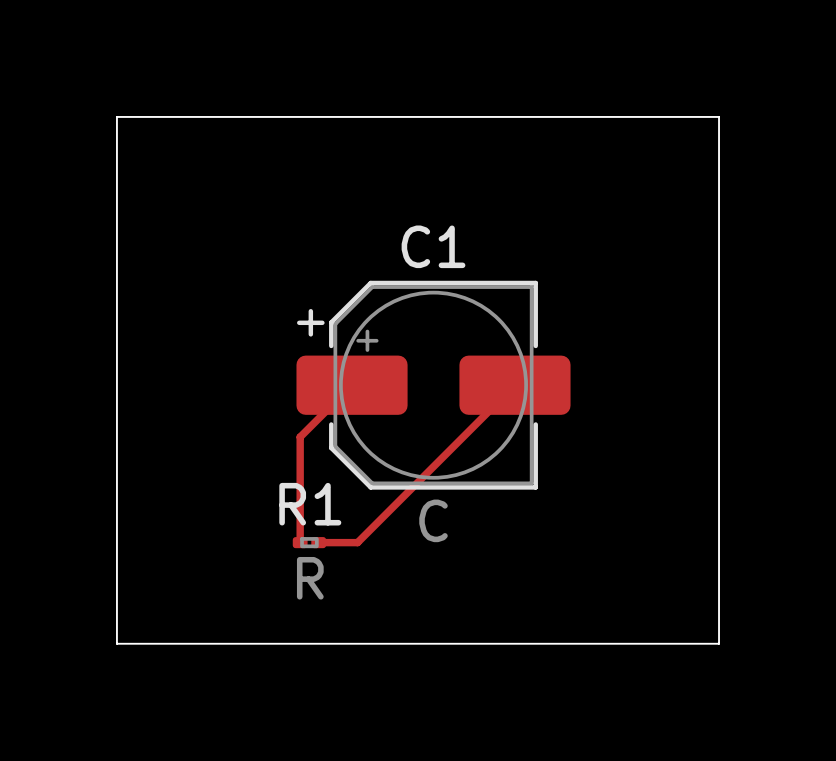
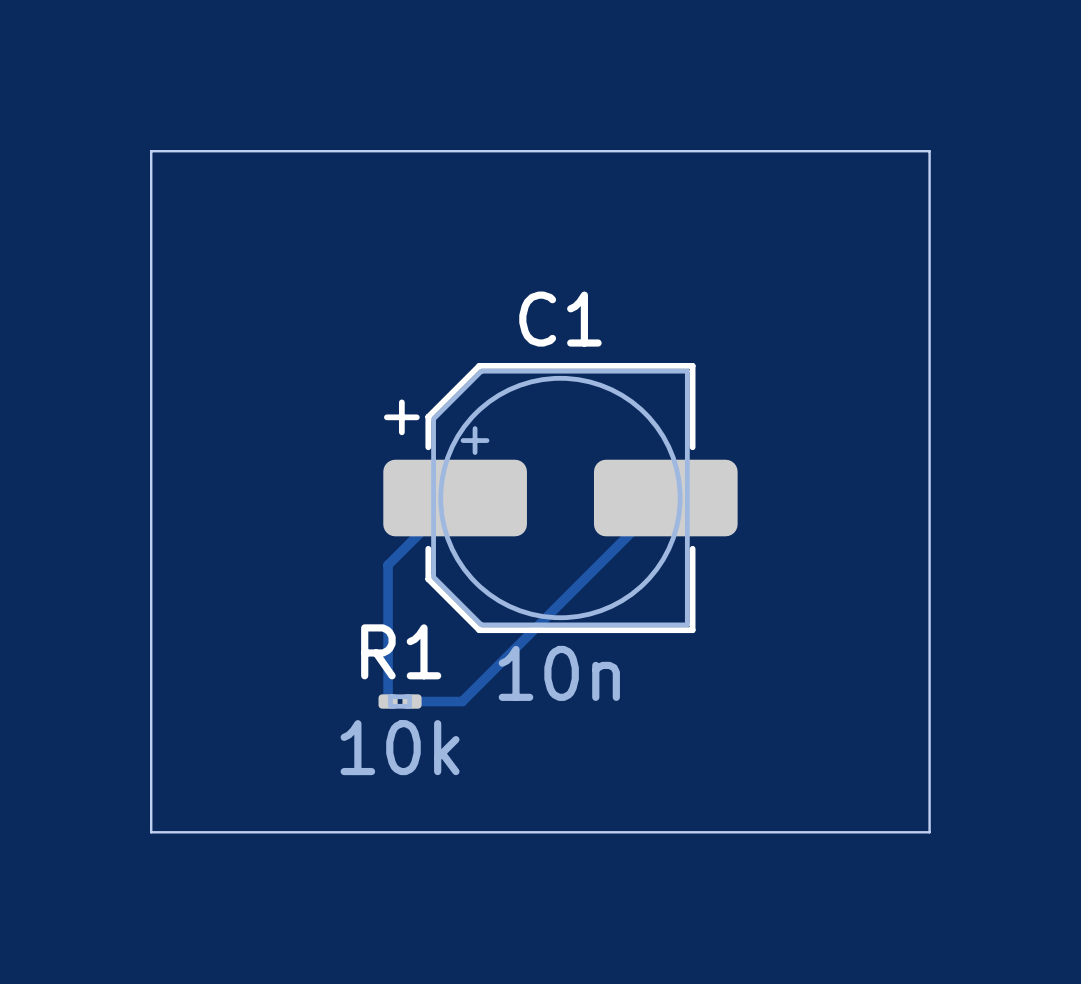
C1 value: C (433, 520) -> 10n (559, 673)
R1 value: R (310, 578) -> 10k (400, 747)

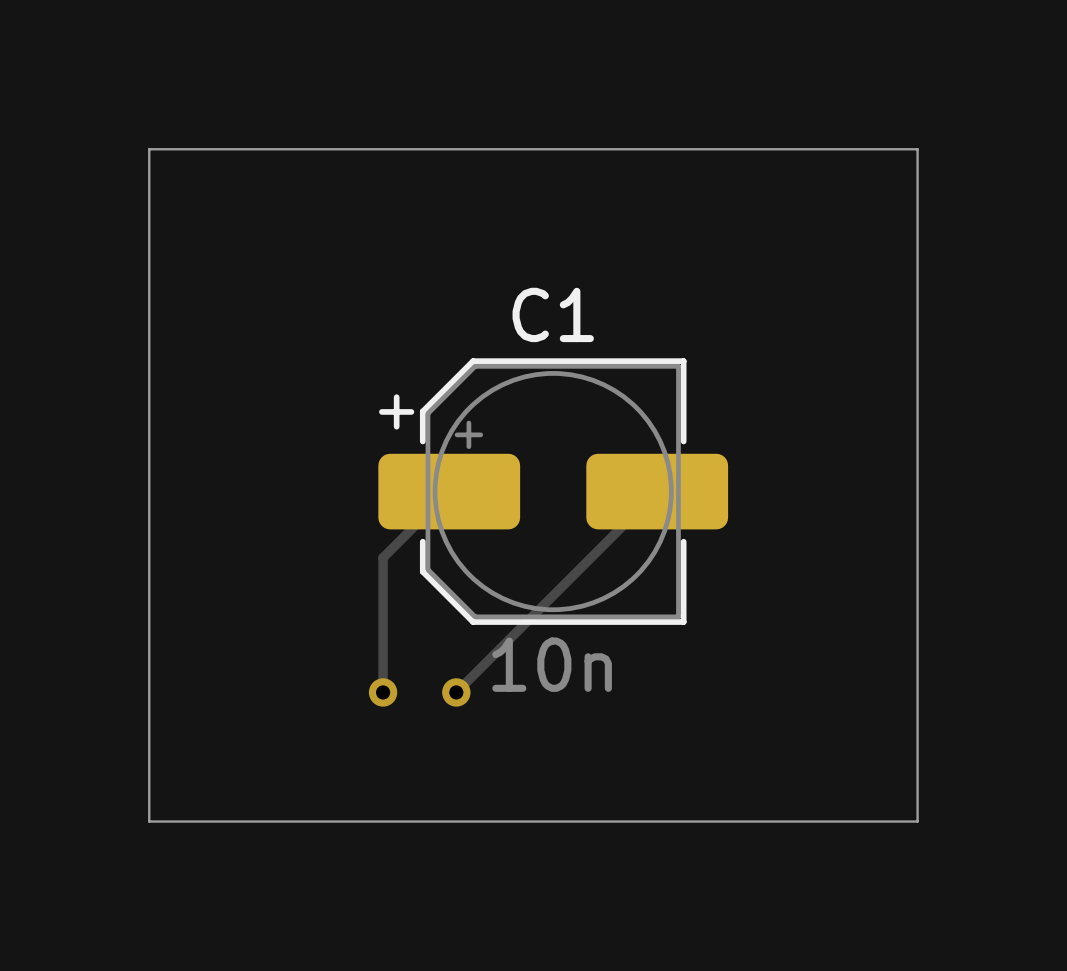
via: none -> (383, 692)
R1: 10k (400, 701) -> none
track: (412, 701) (462, 701) -> none
via: none -> (456, 692)

